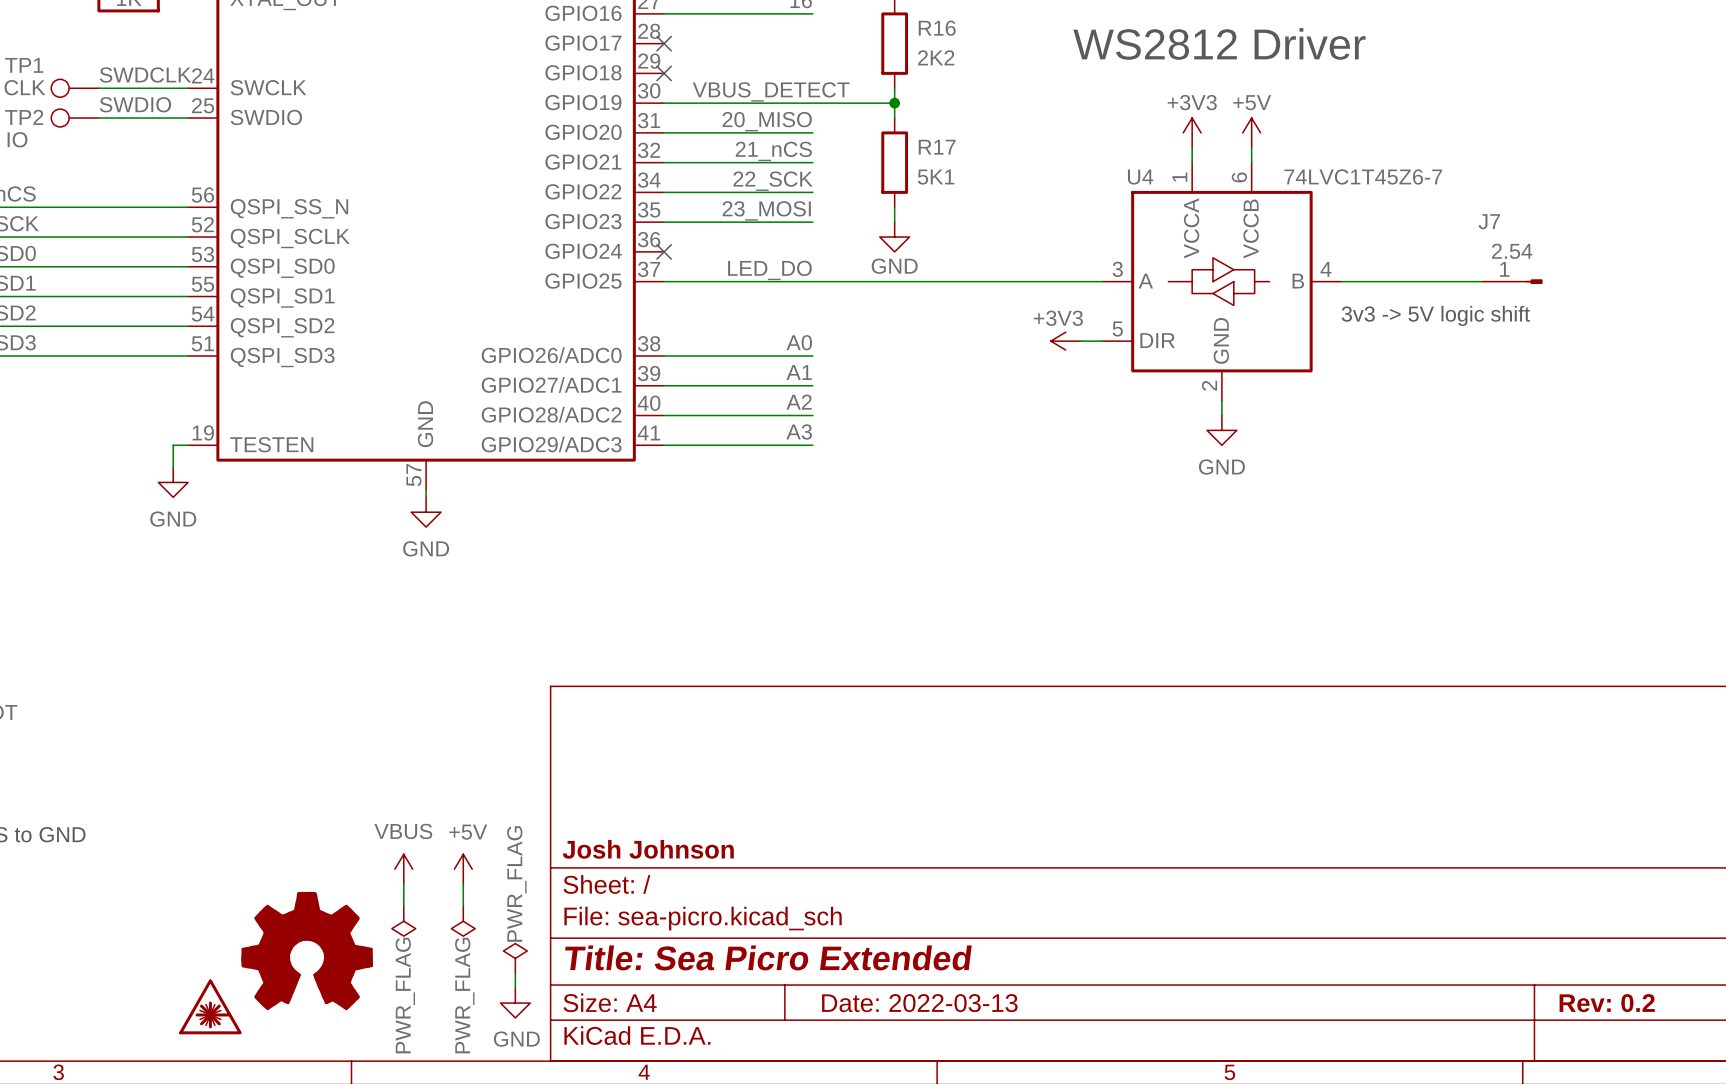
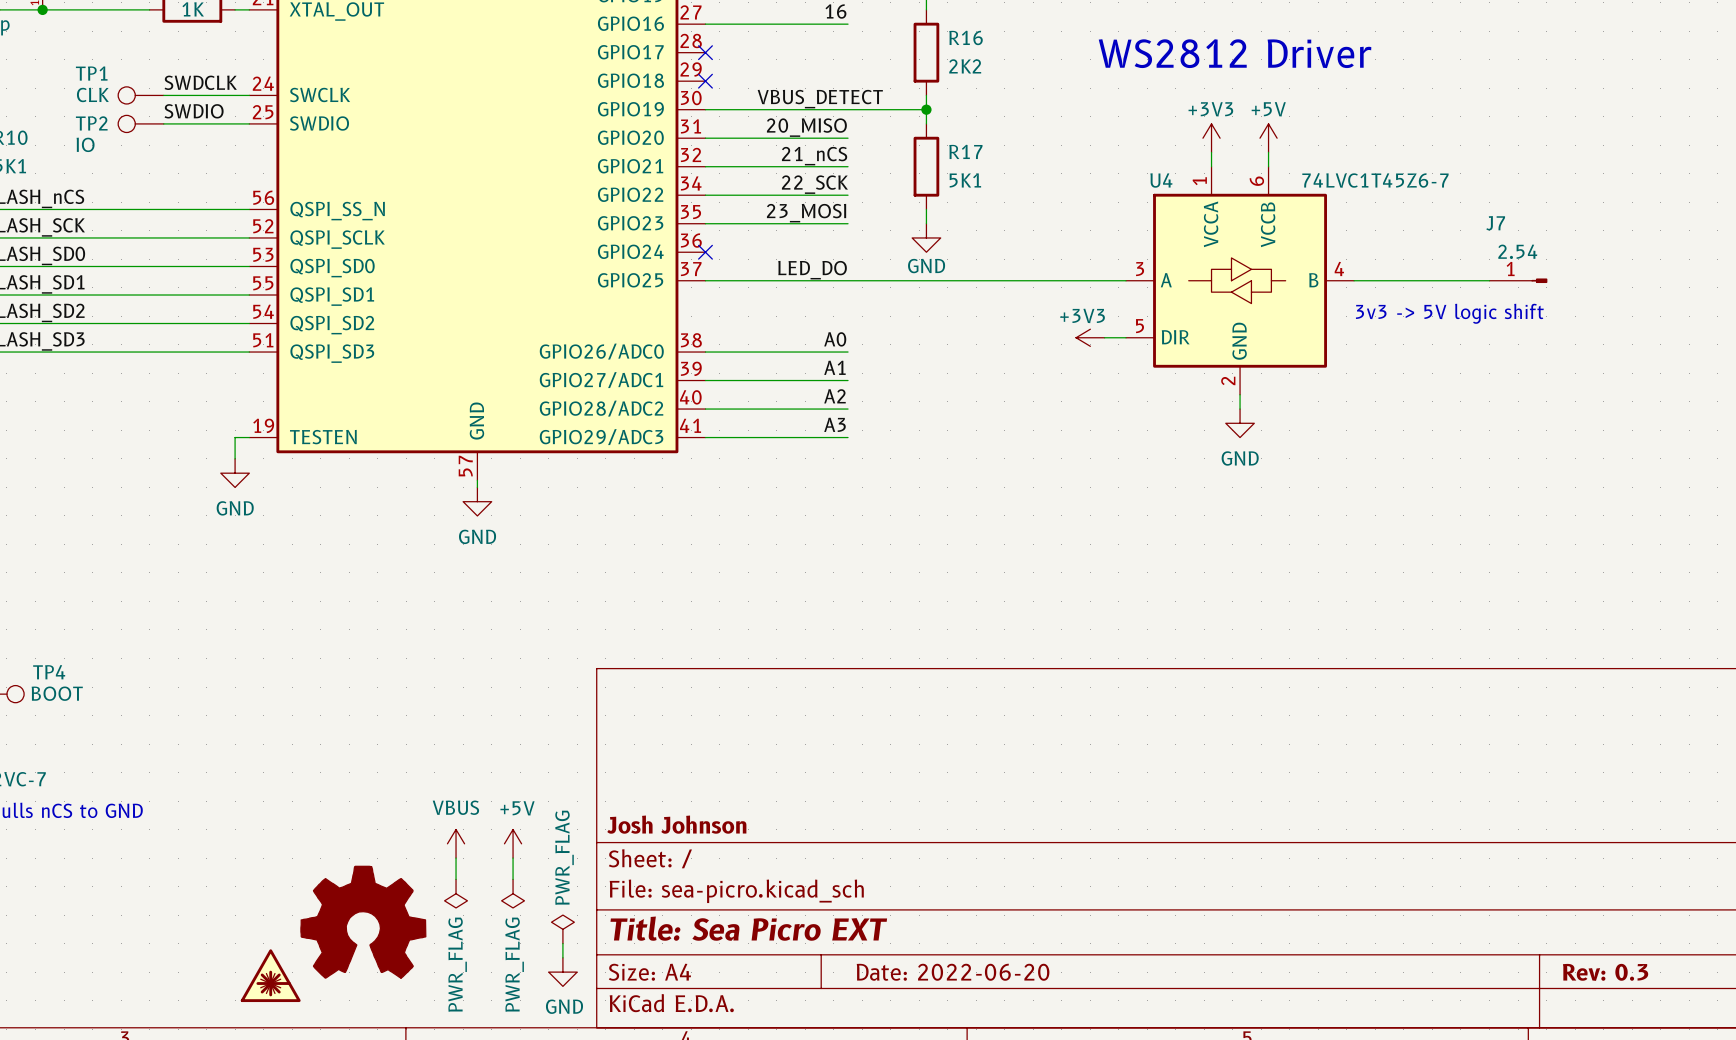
title block: Title: Sea Picro Extended (768, 957) -> Title: Sea Picro EXT (748, 928)
title block: Date: 2022-03-13 (919, 1003) -> Date: 2022-06-20 (953, 972)
title block: Rev: 0.2 (1607, 1003) -> Rev: 0.3 (1605, 972)

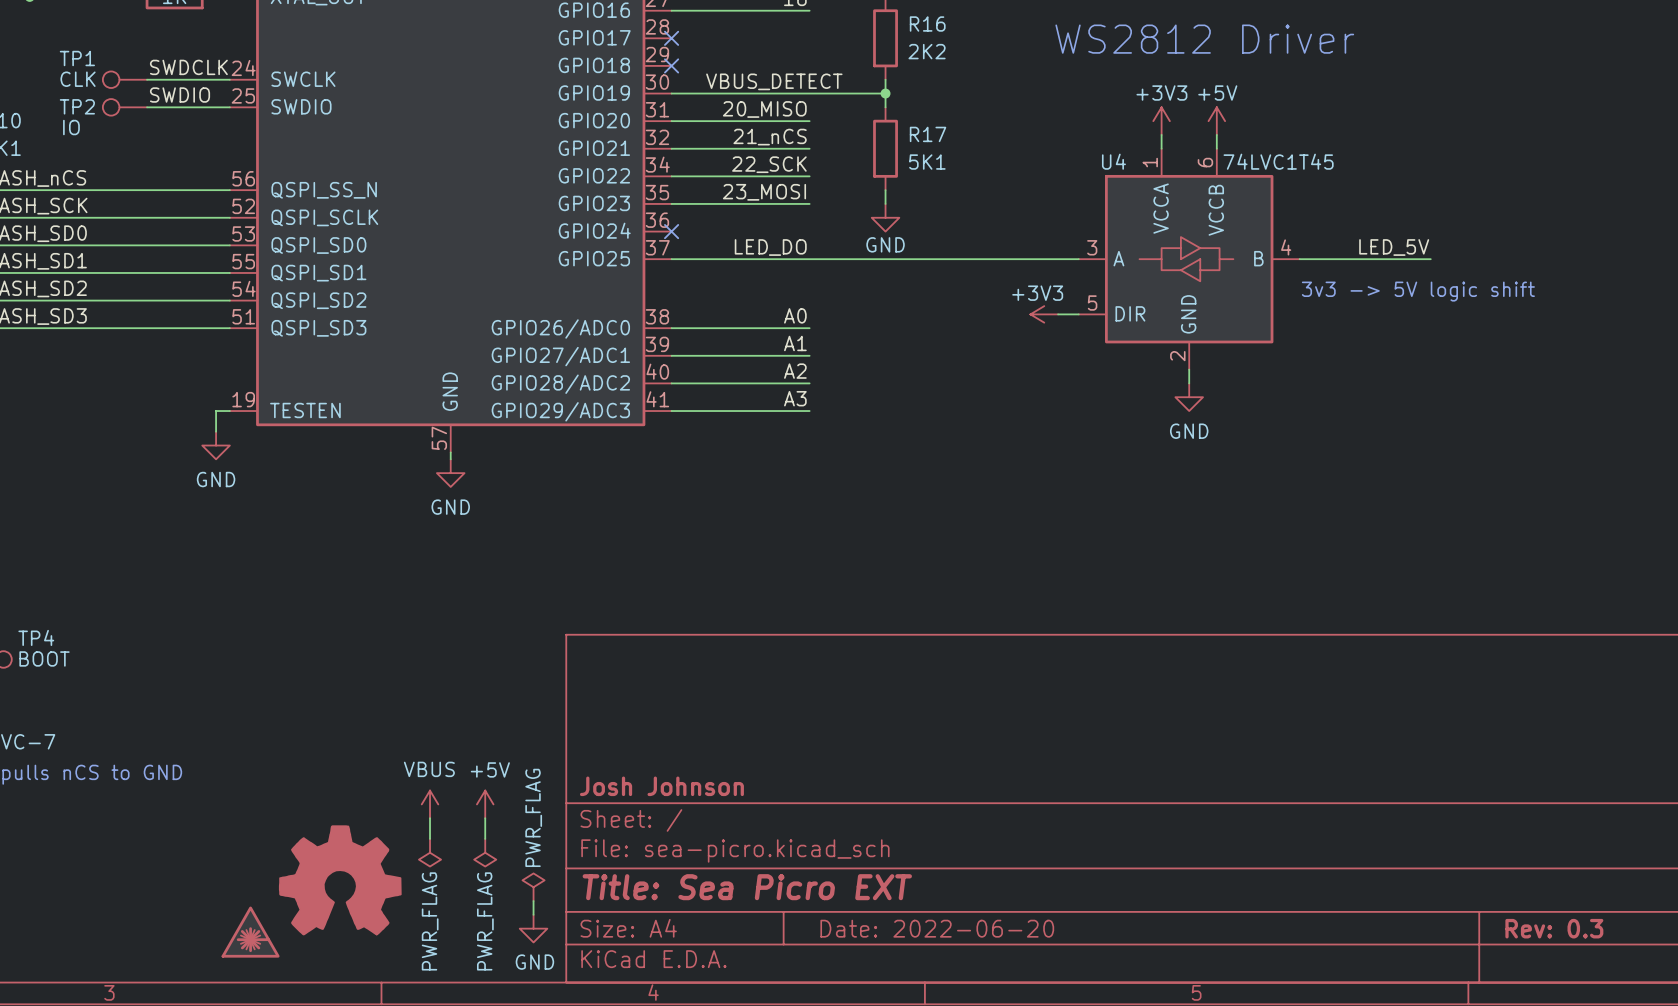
U4 value: 74LVC1T45Z6-7 (1375, 180) -> 74LVC1T45 (1278, 161)
label: none -> LED_5V (1394, 247)
J7: 2.54 (1518, 280) -> none

